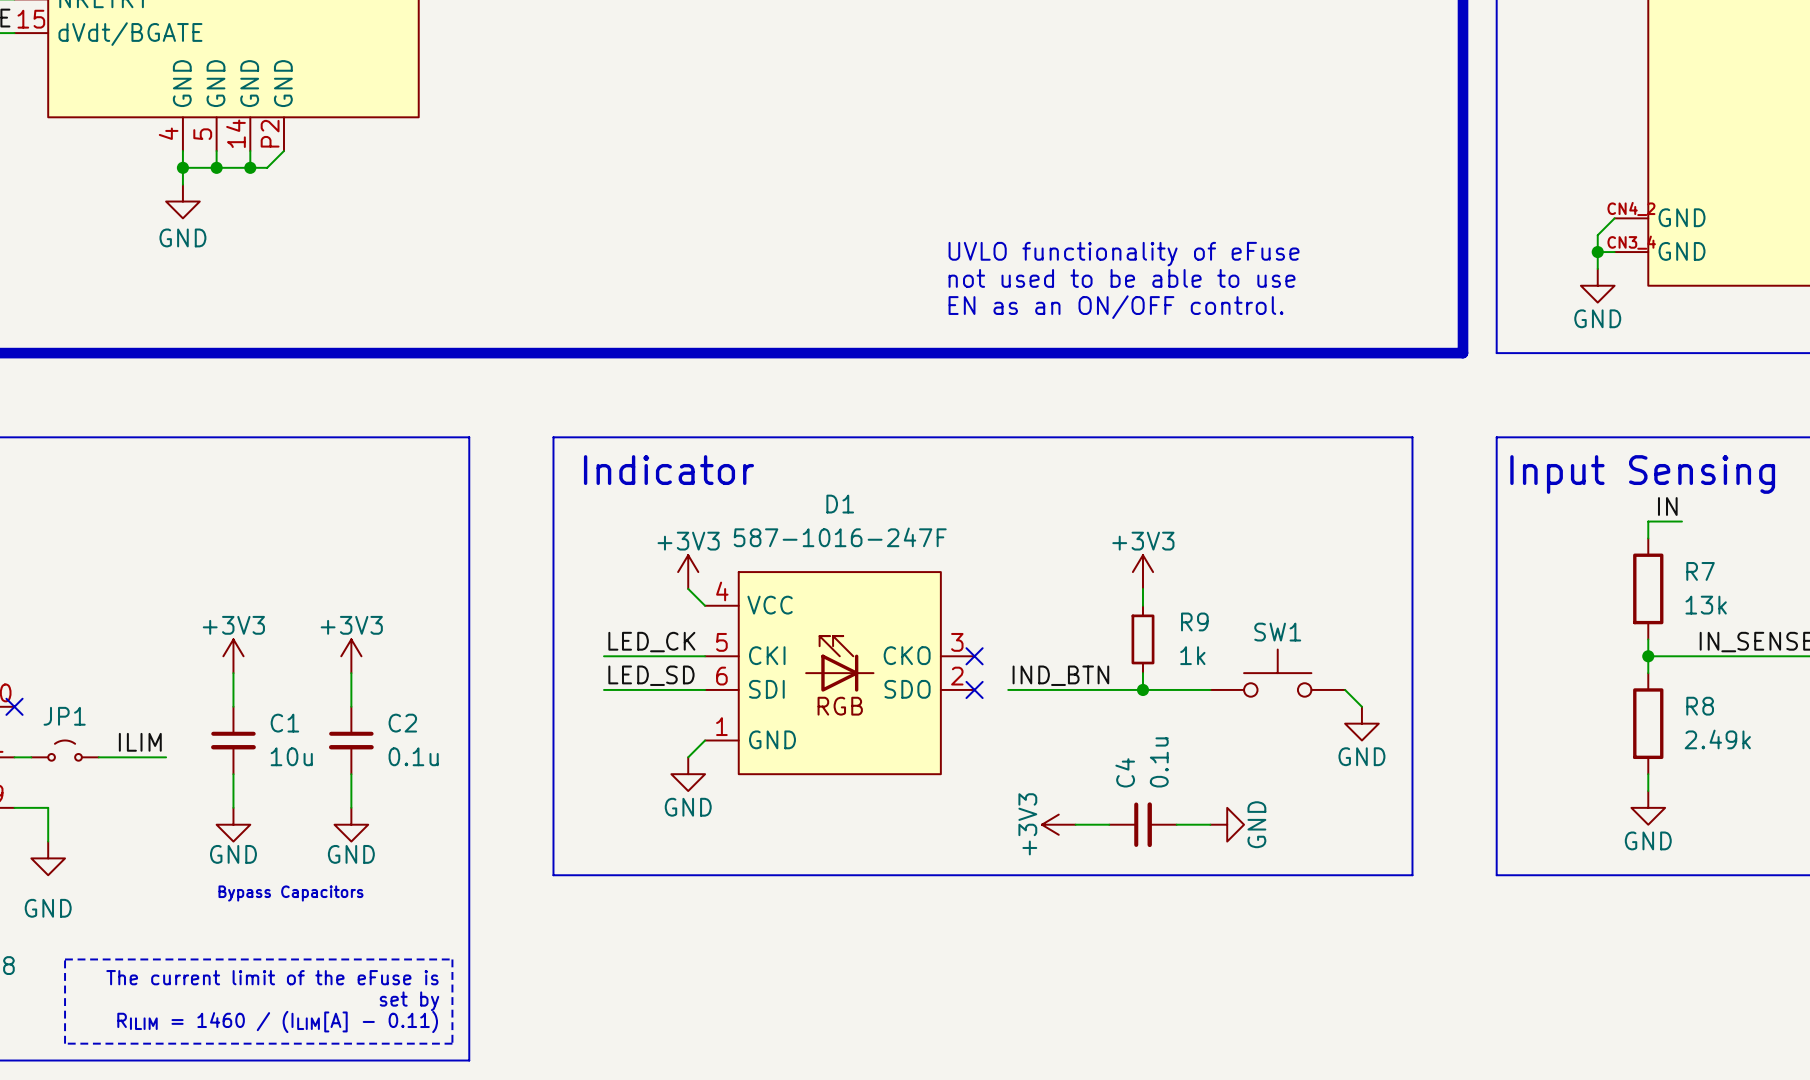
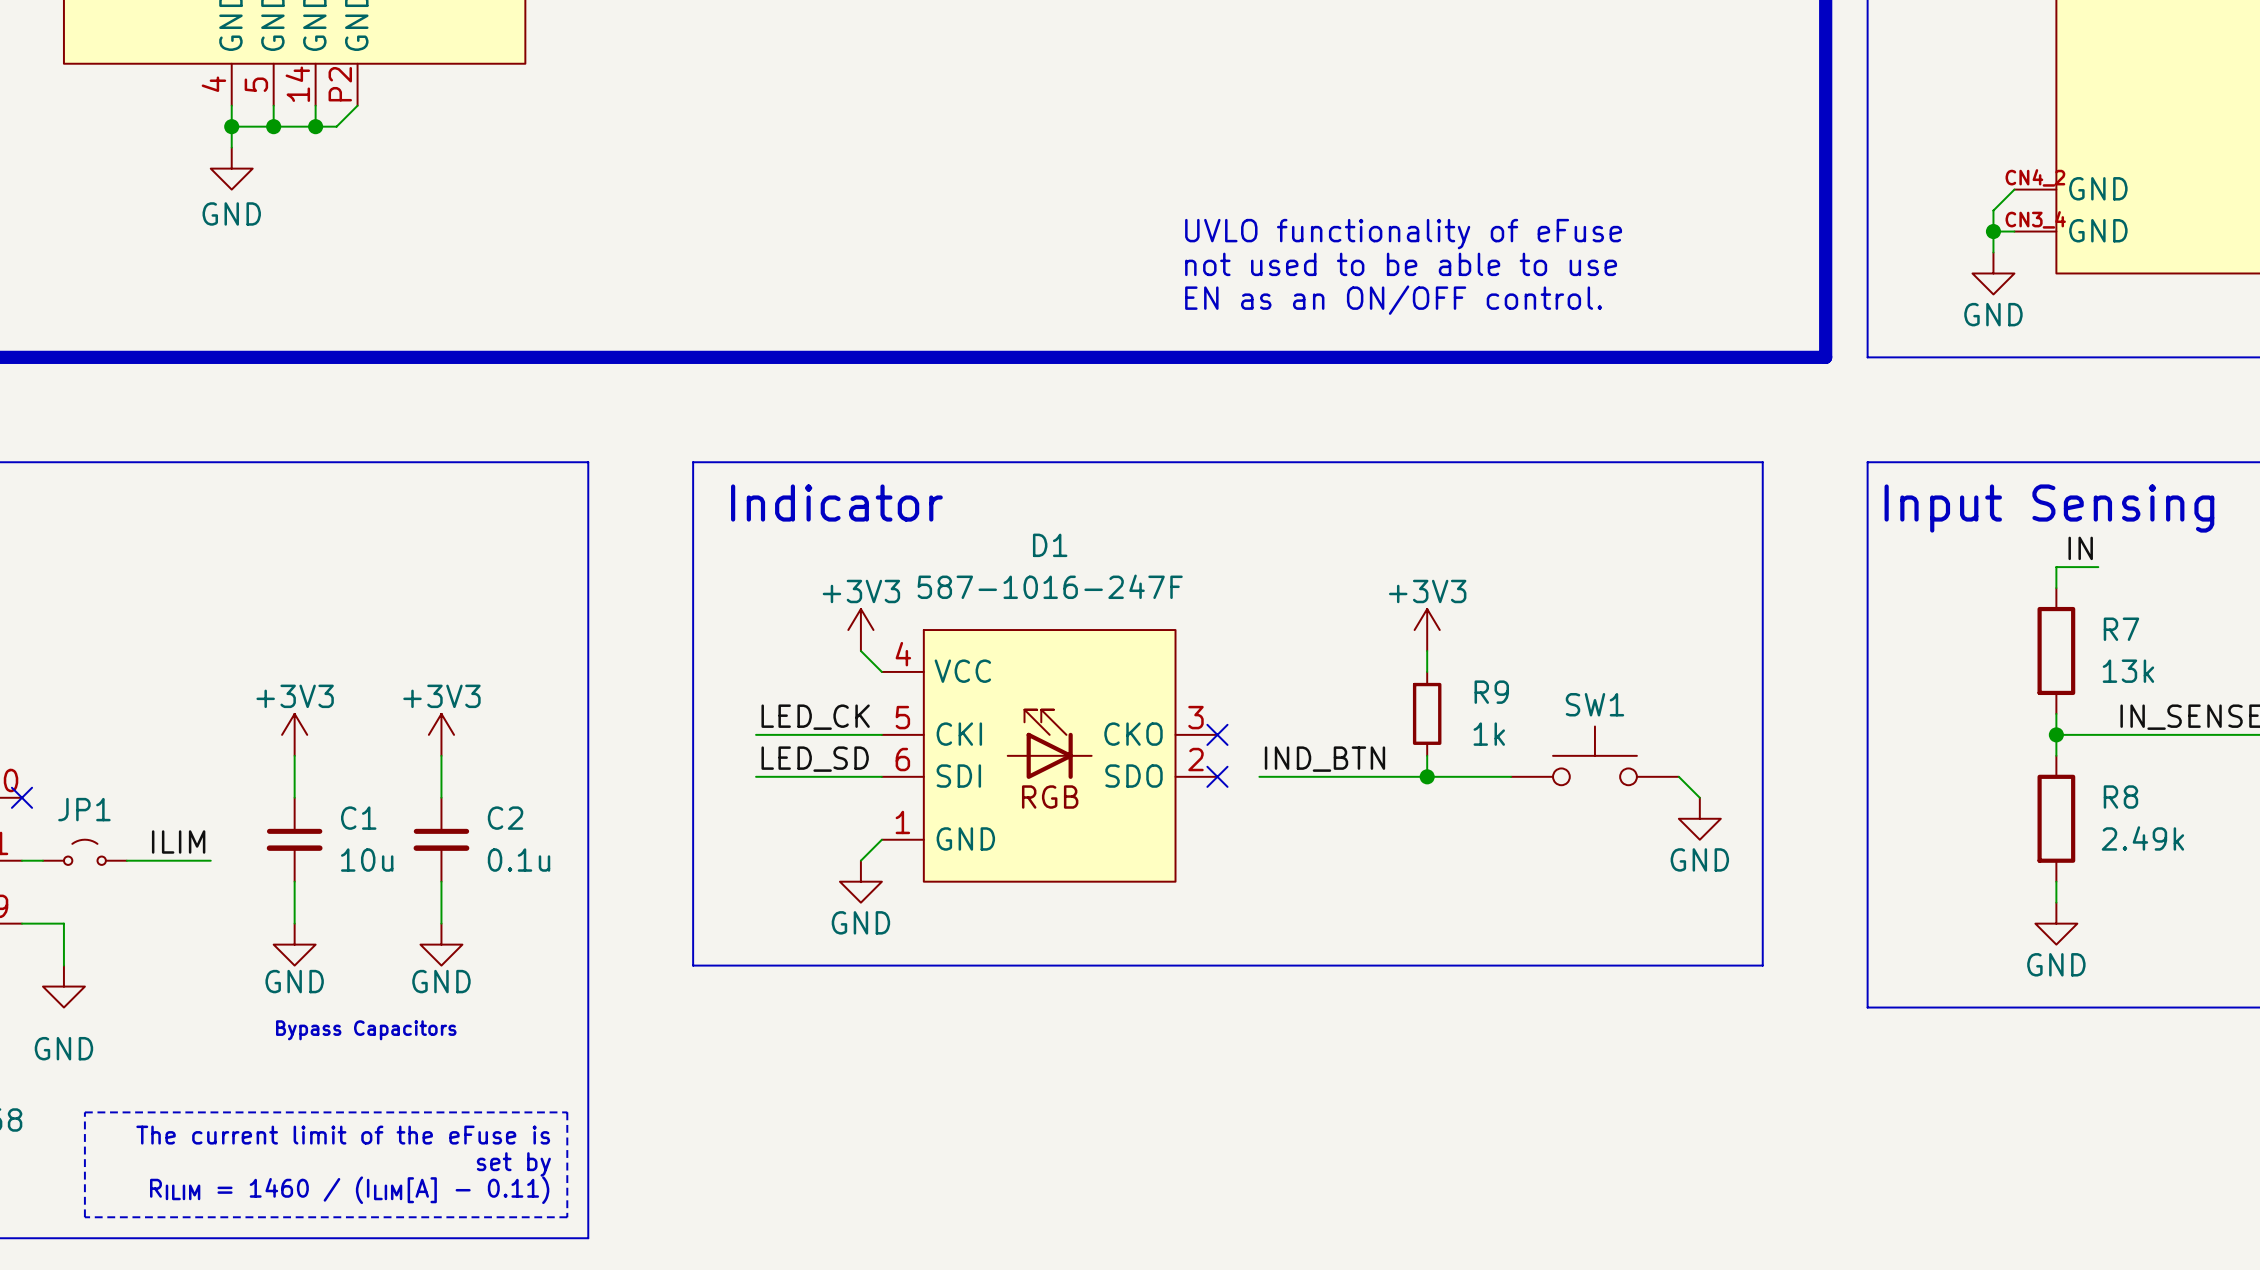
power symbol: +3V3 (1058, 824) -> none
wire: (1075, 824) (1109, 824) -> none
C4: 0.1u (1142, 824) -> none
wire: (1176, 824) (1210, 824) -> none
power symbol: GND (1227, 824) -> none
line: (553, 841) (553, 875) (1412, 875) (1412, 841) -> (693, 965) (1762, 965)

